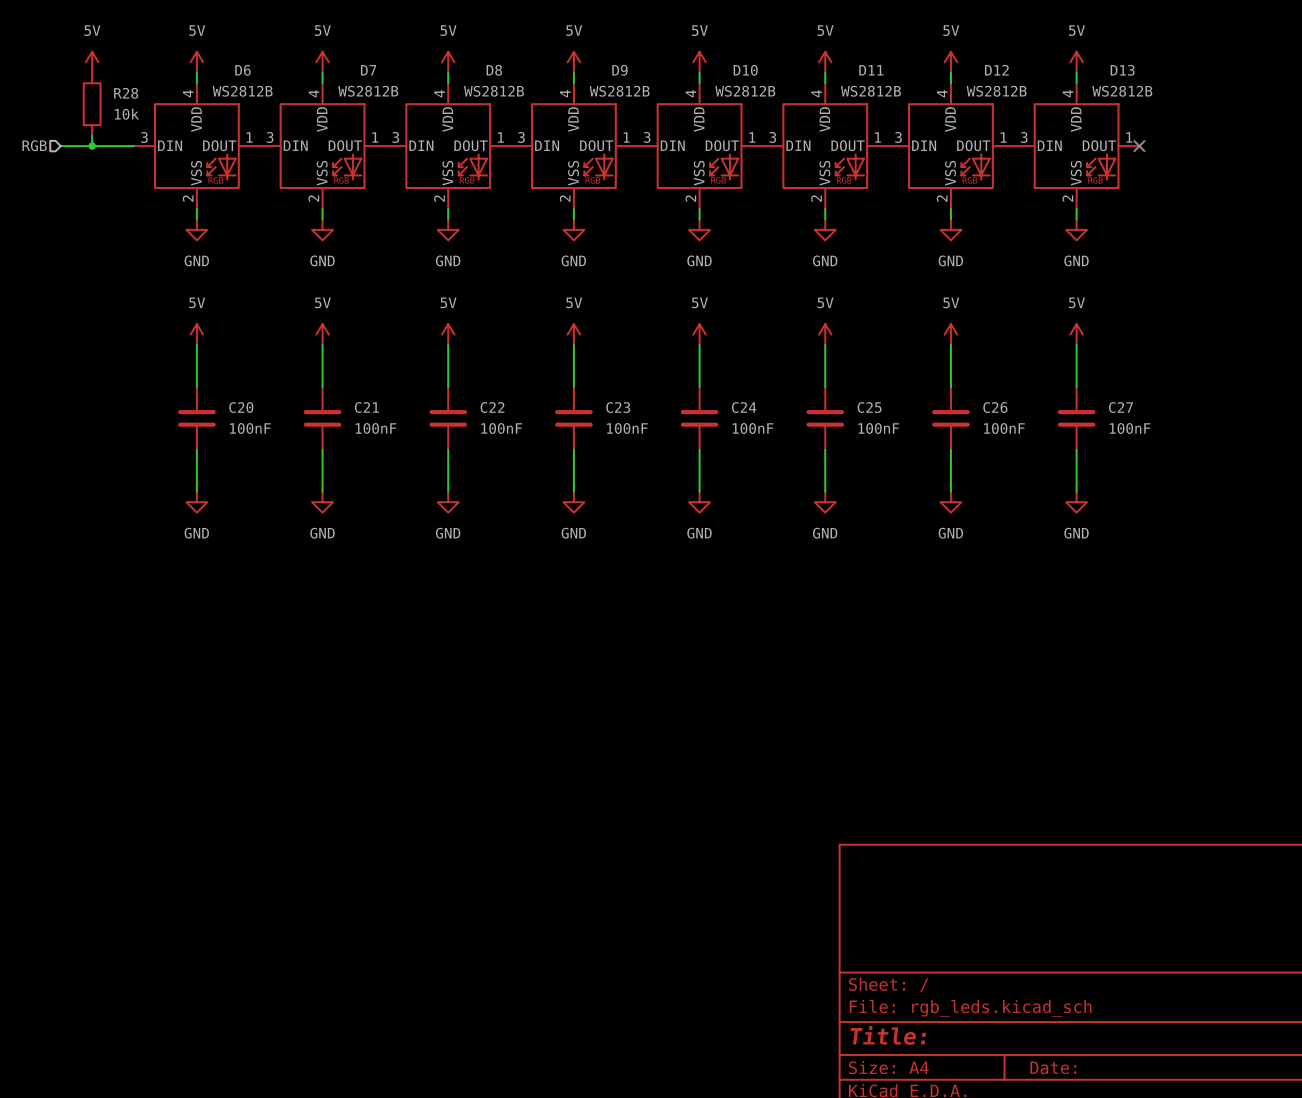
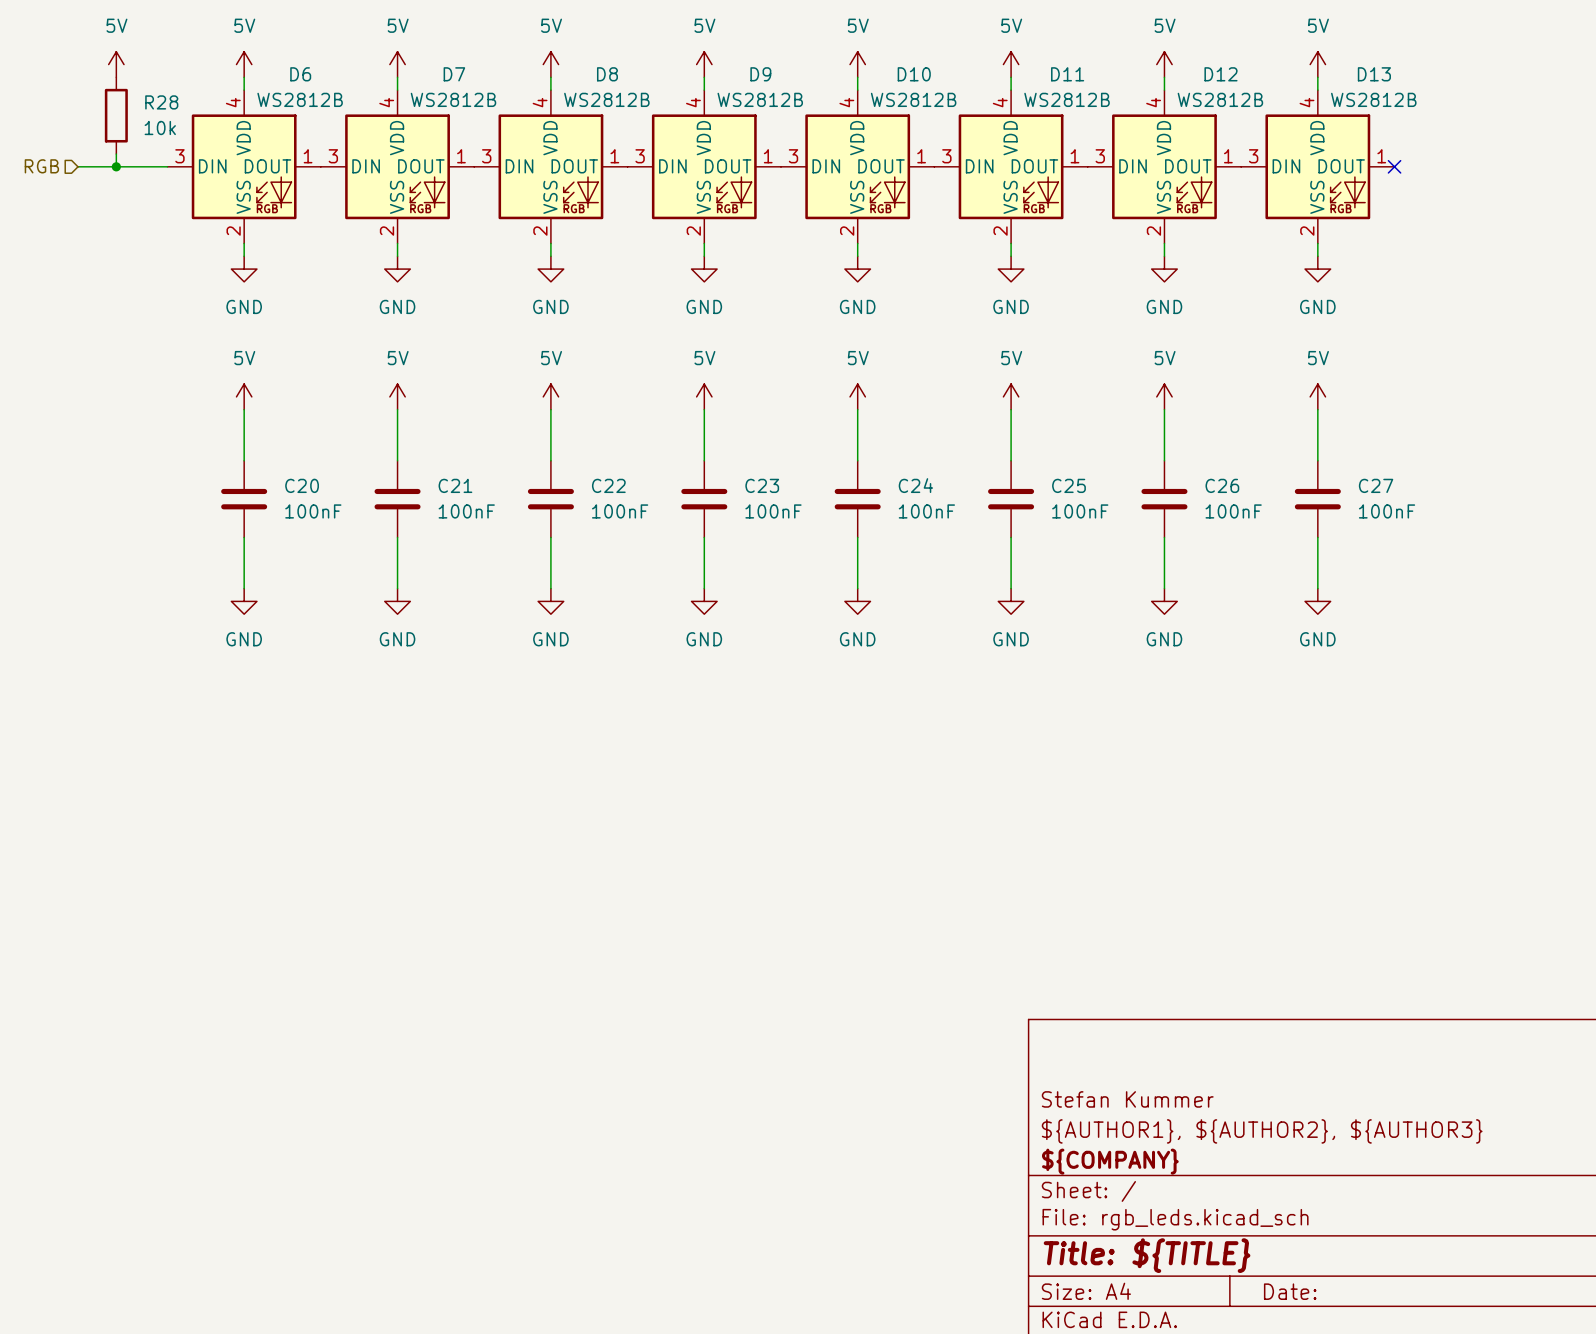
title block: none -> Stefan Kummer (1127, 1099)
title block: none -> ${AUTHOR1}, ${AUTHOR2}, ${AUTHOR3} (1262, 1131)
title block: none -> ${COMPANY} (1110, 1161)
title block: Title: (888, 1035) -> Title: ${TITLE} (1147, 1255)

